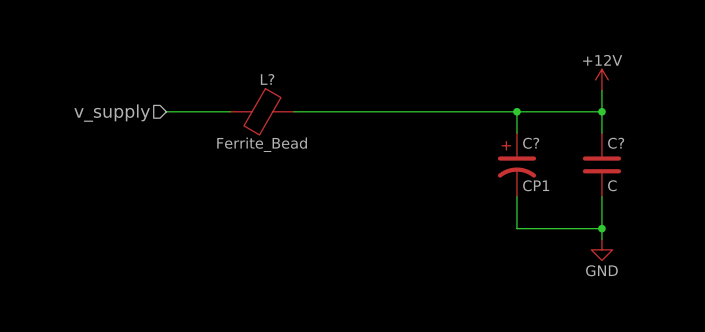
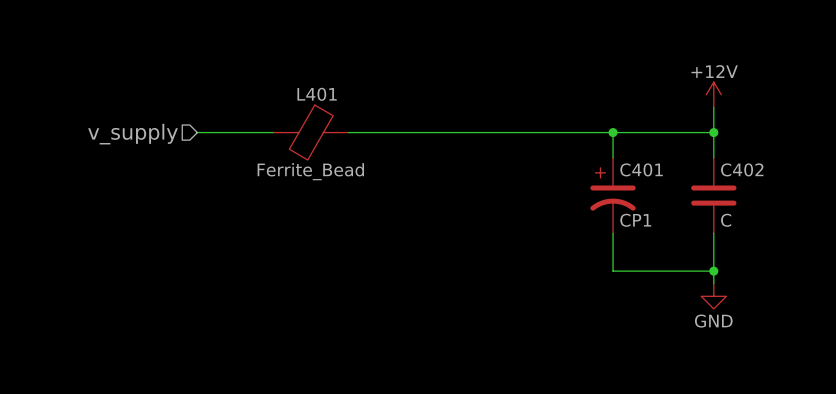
L? name: L? (267, 79) -> L401 (317, 94)
C? name: C? (531, 143) -> C401 (641, 169)
C? name: C? (616, 143) -> C402 (742, 169)

